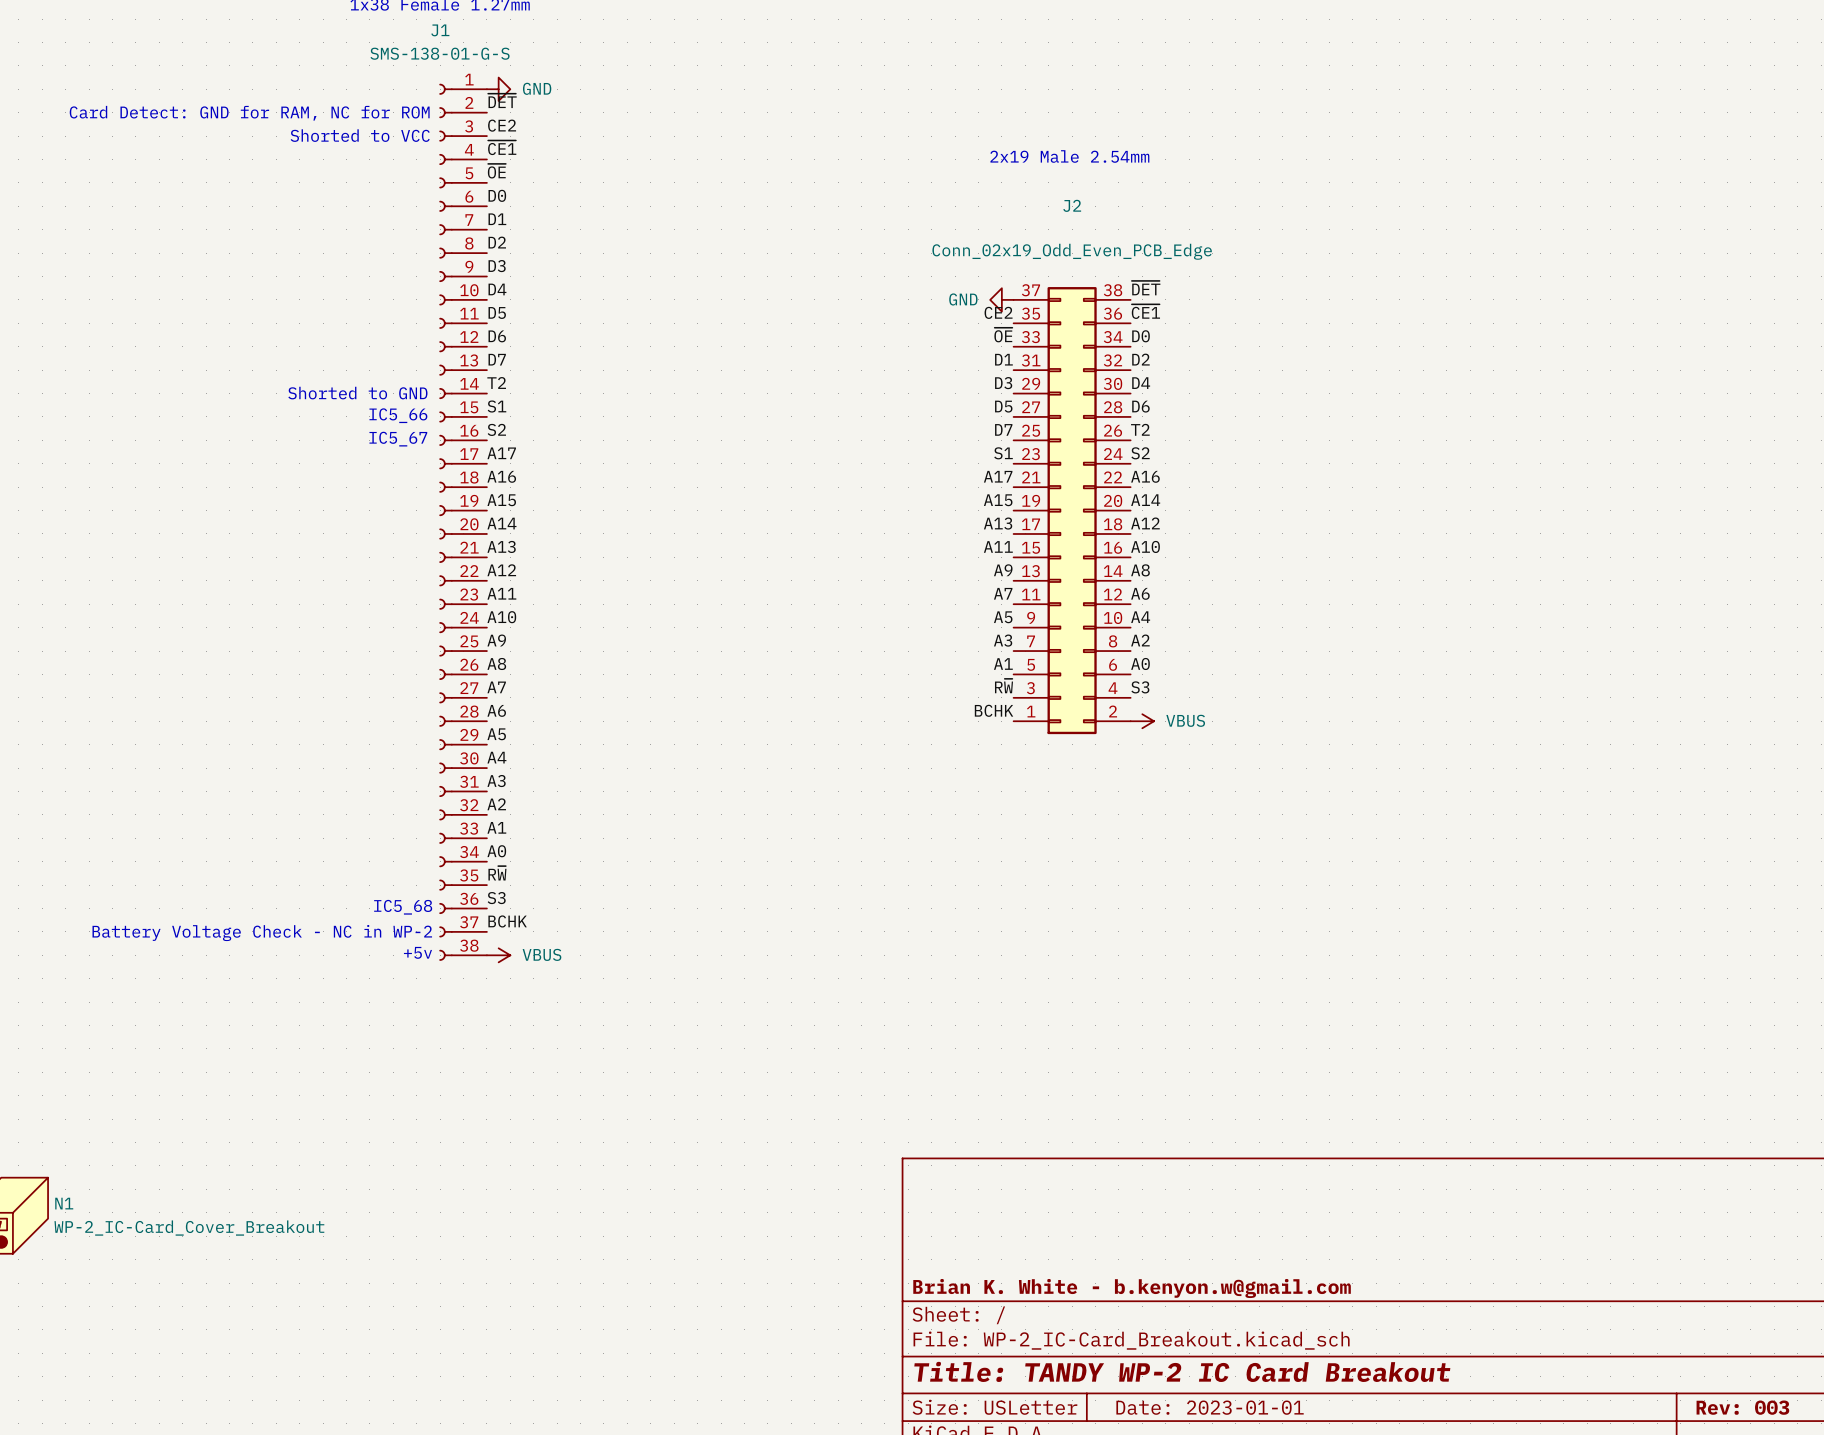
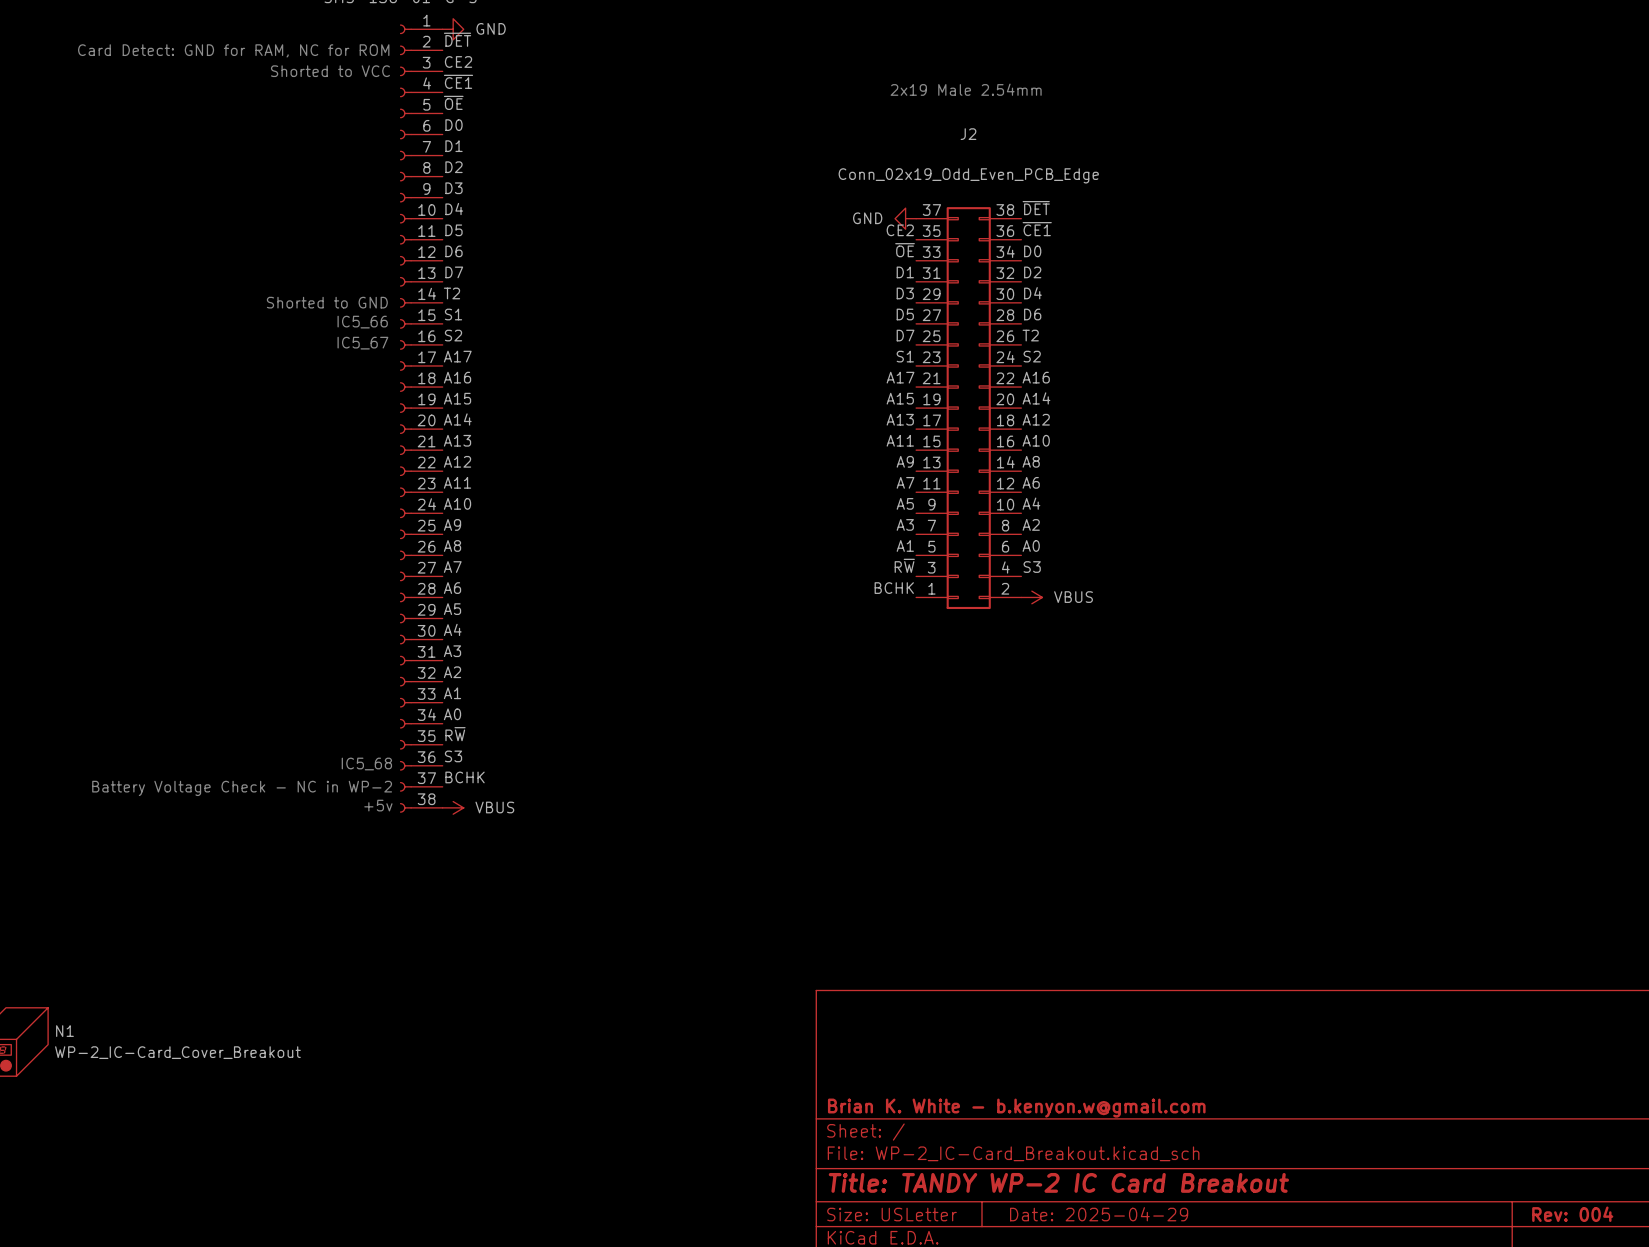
title block: Date: 2023-01-01 (1210, 1407) -> Date: 2025-04-29 (1099, 1214)
title block: Rev: 003 (1742, 1407) -> Rev: 004 (1572, 1214)

